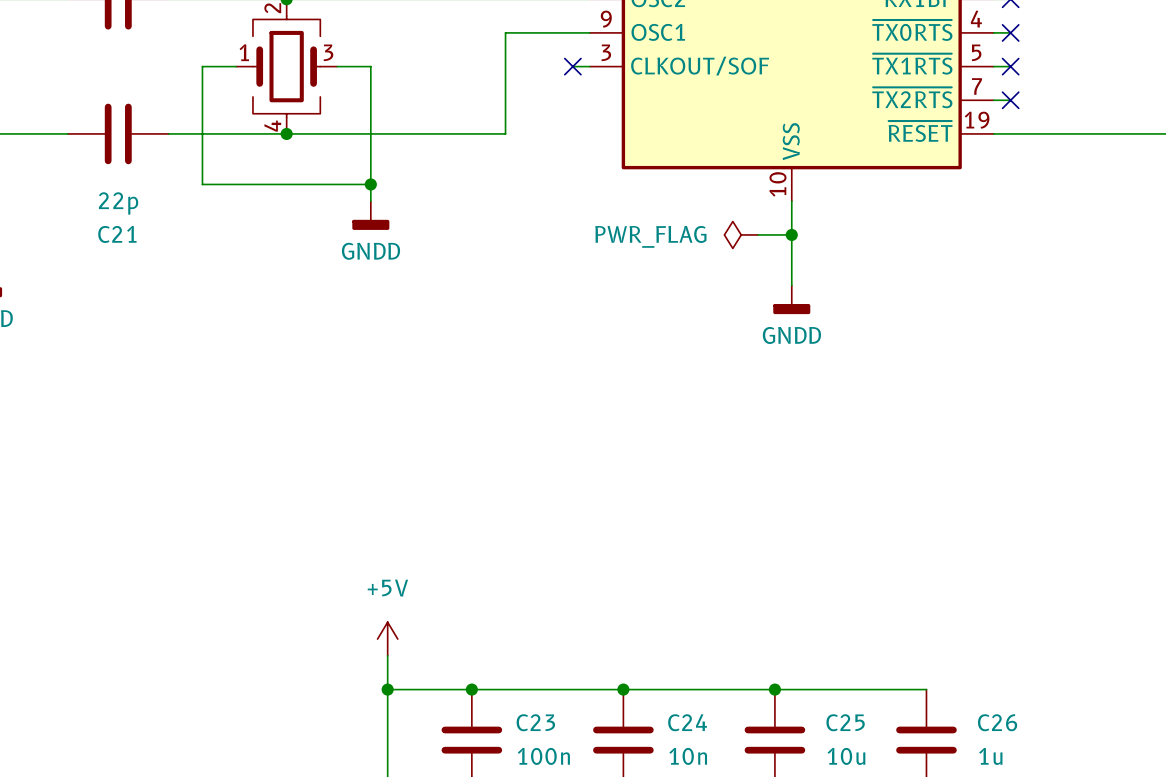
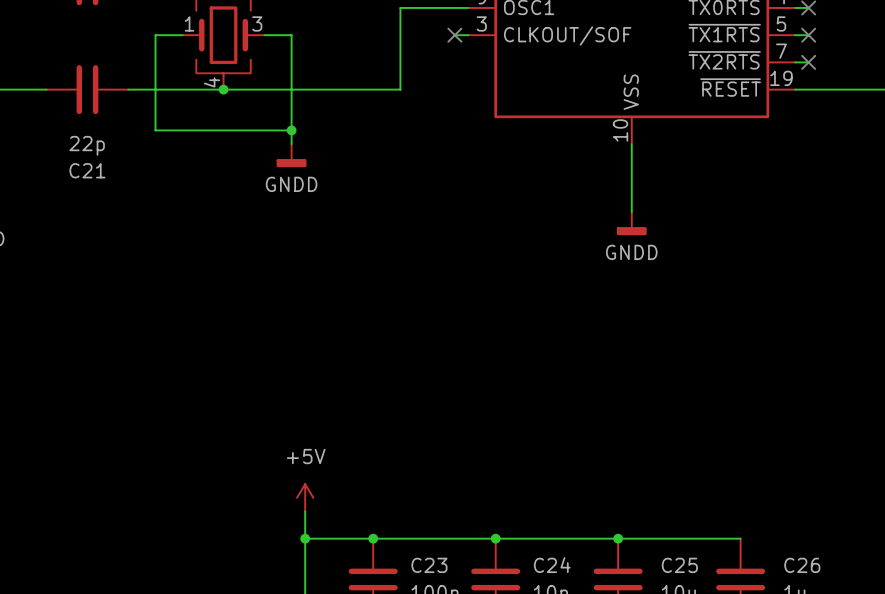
power symbol: PWR_FLAG (741, 234) -> none
wire: (758, 234) (791, 234) -> none
junction: (791, 234) -> none

